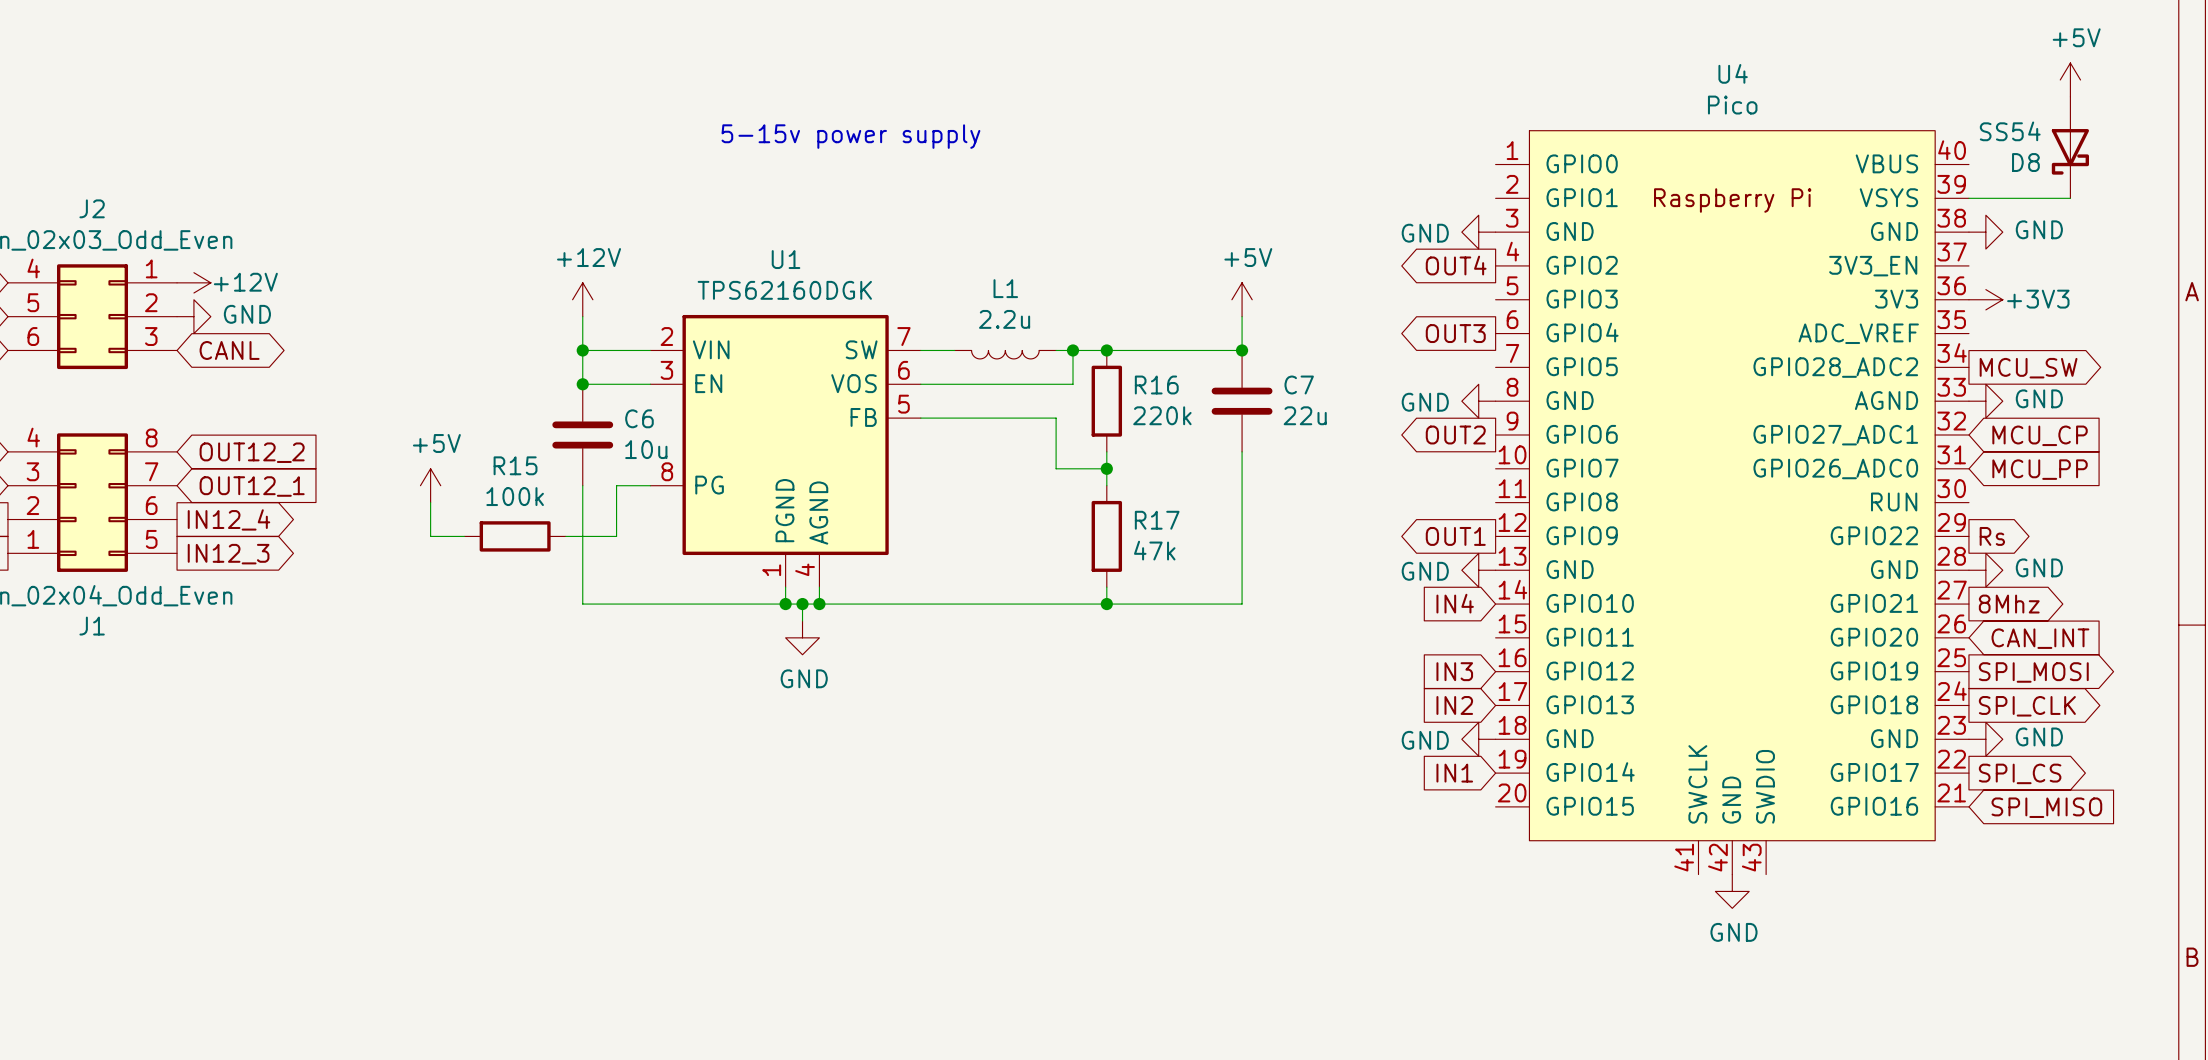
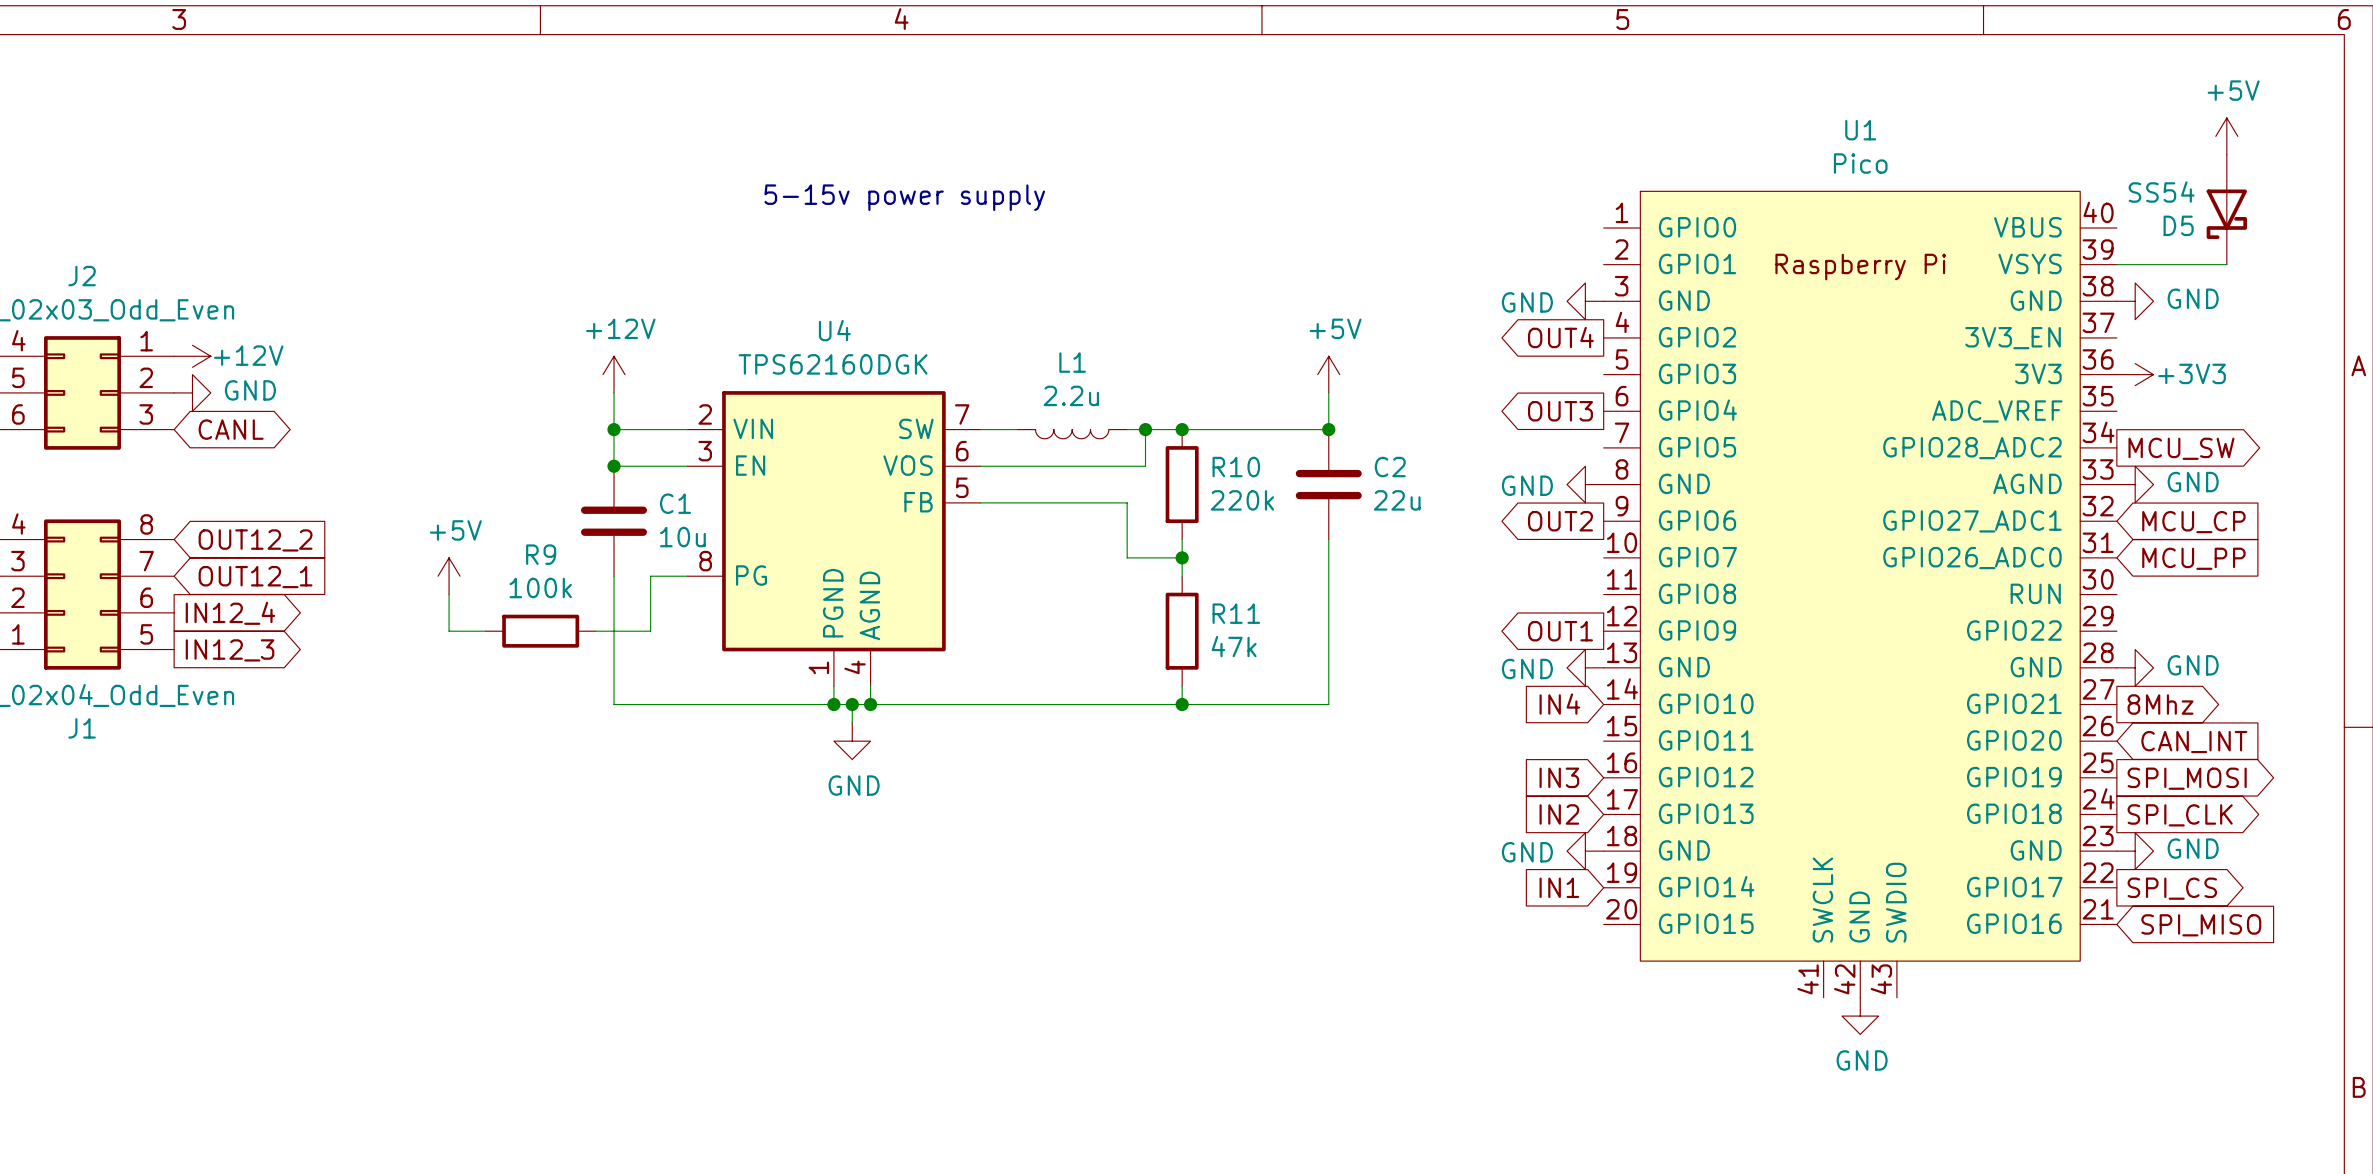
U4 name: U4 (1733, 73) -> U1 (1860, 130)
D8 name: D8 (2025, 162) -> D5 (2178, 225)
U1 name: U1 (786, 259) -> U4 (834, 330)
R16 name: R16 (1156, 385) -> R10 (1236, 467)
C7 name: C7 (1299, 385) -> C2 (1390, 467)
C6 name: C6 (639, 418) -> C1 (675, 503)
R15 name: R15 (515, 465) -> R9 (541, 554)
R17 name: R17 (1157, 520) -> R11 (1236, 613)
global label: Rs (1992, 536) -> none

